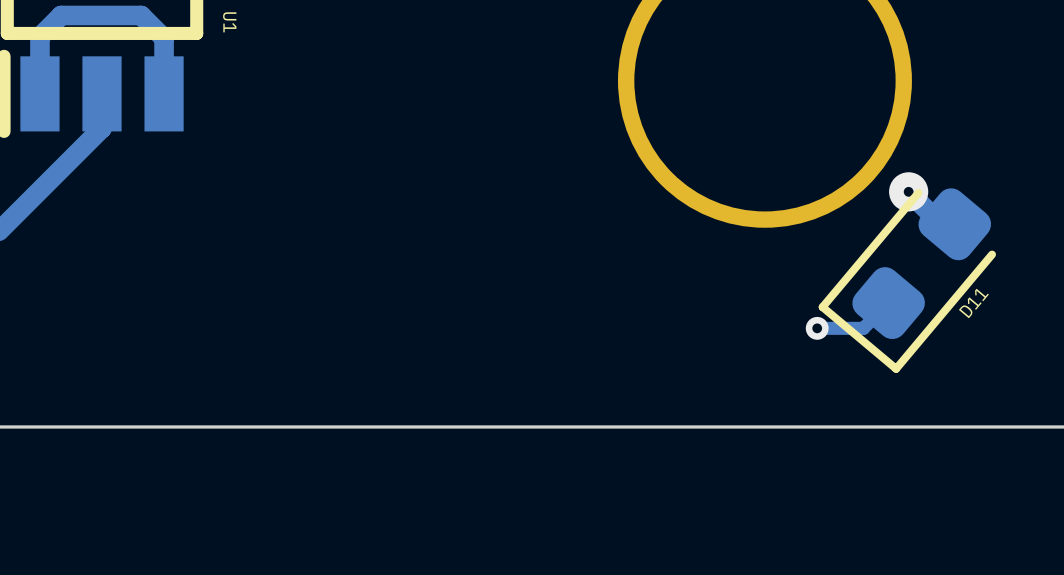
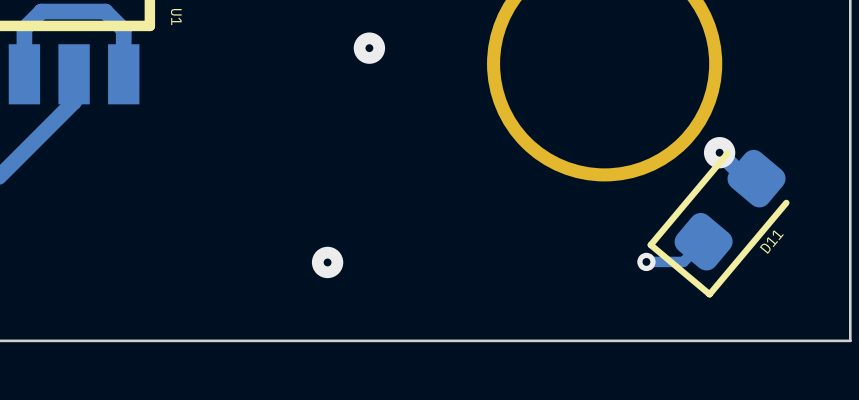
via: none -> (369, 48)
via: none -> (327, 262)

